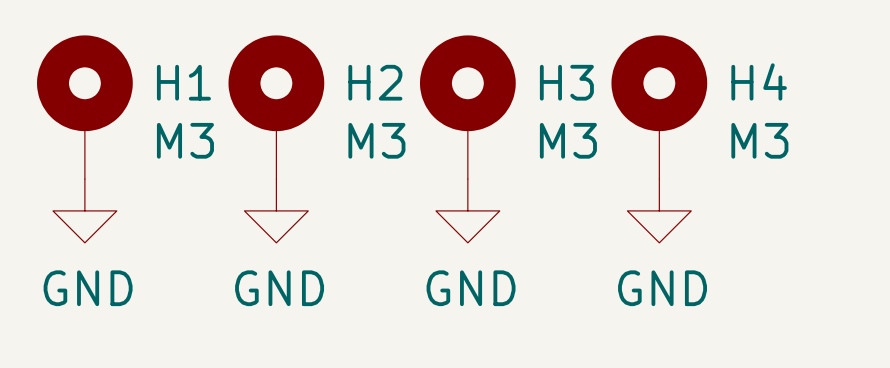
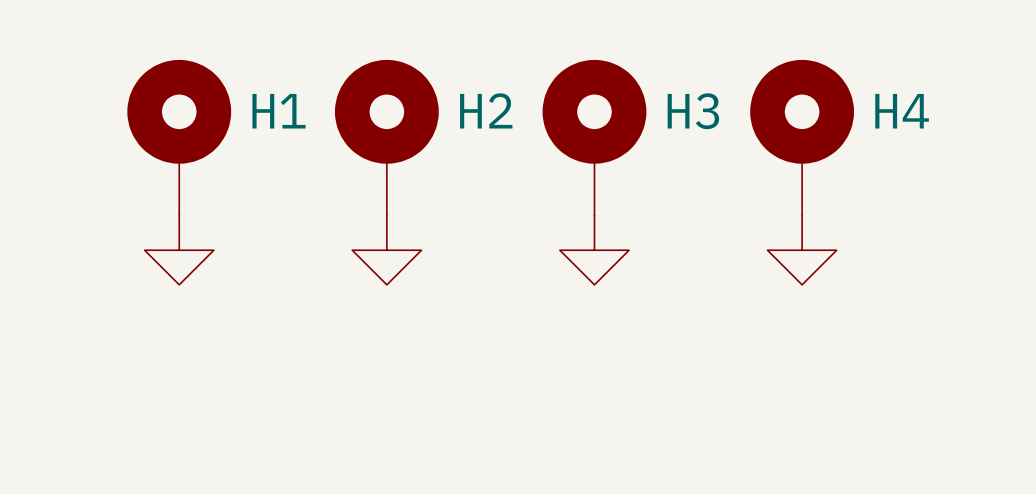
H1 value: M3 (185, 140) -> none
H2 value: M3 (376, 140) -> none
H3 value: M3 (568, 140) -> none
H4 value: M3 (759, 140) -> none
power symbol text: GND (88, 288) -> none
power symbol text: GND (279, 288) -> none
power symbol text: GND (471, 288) -> none
power symbol text: GND (662, 288) -> none

